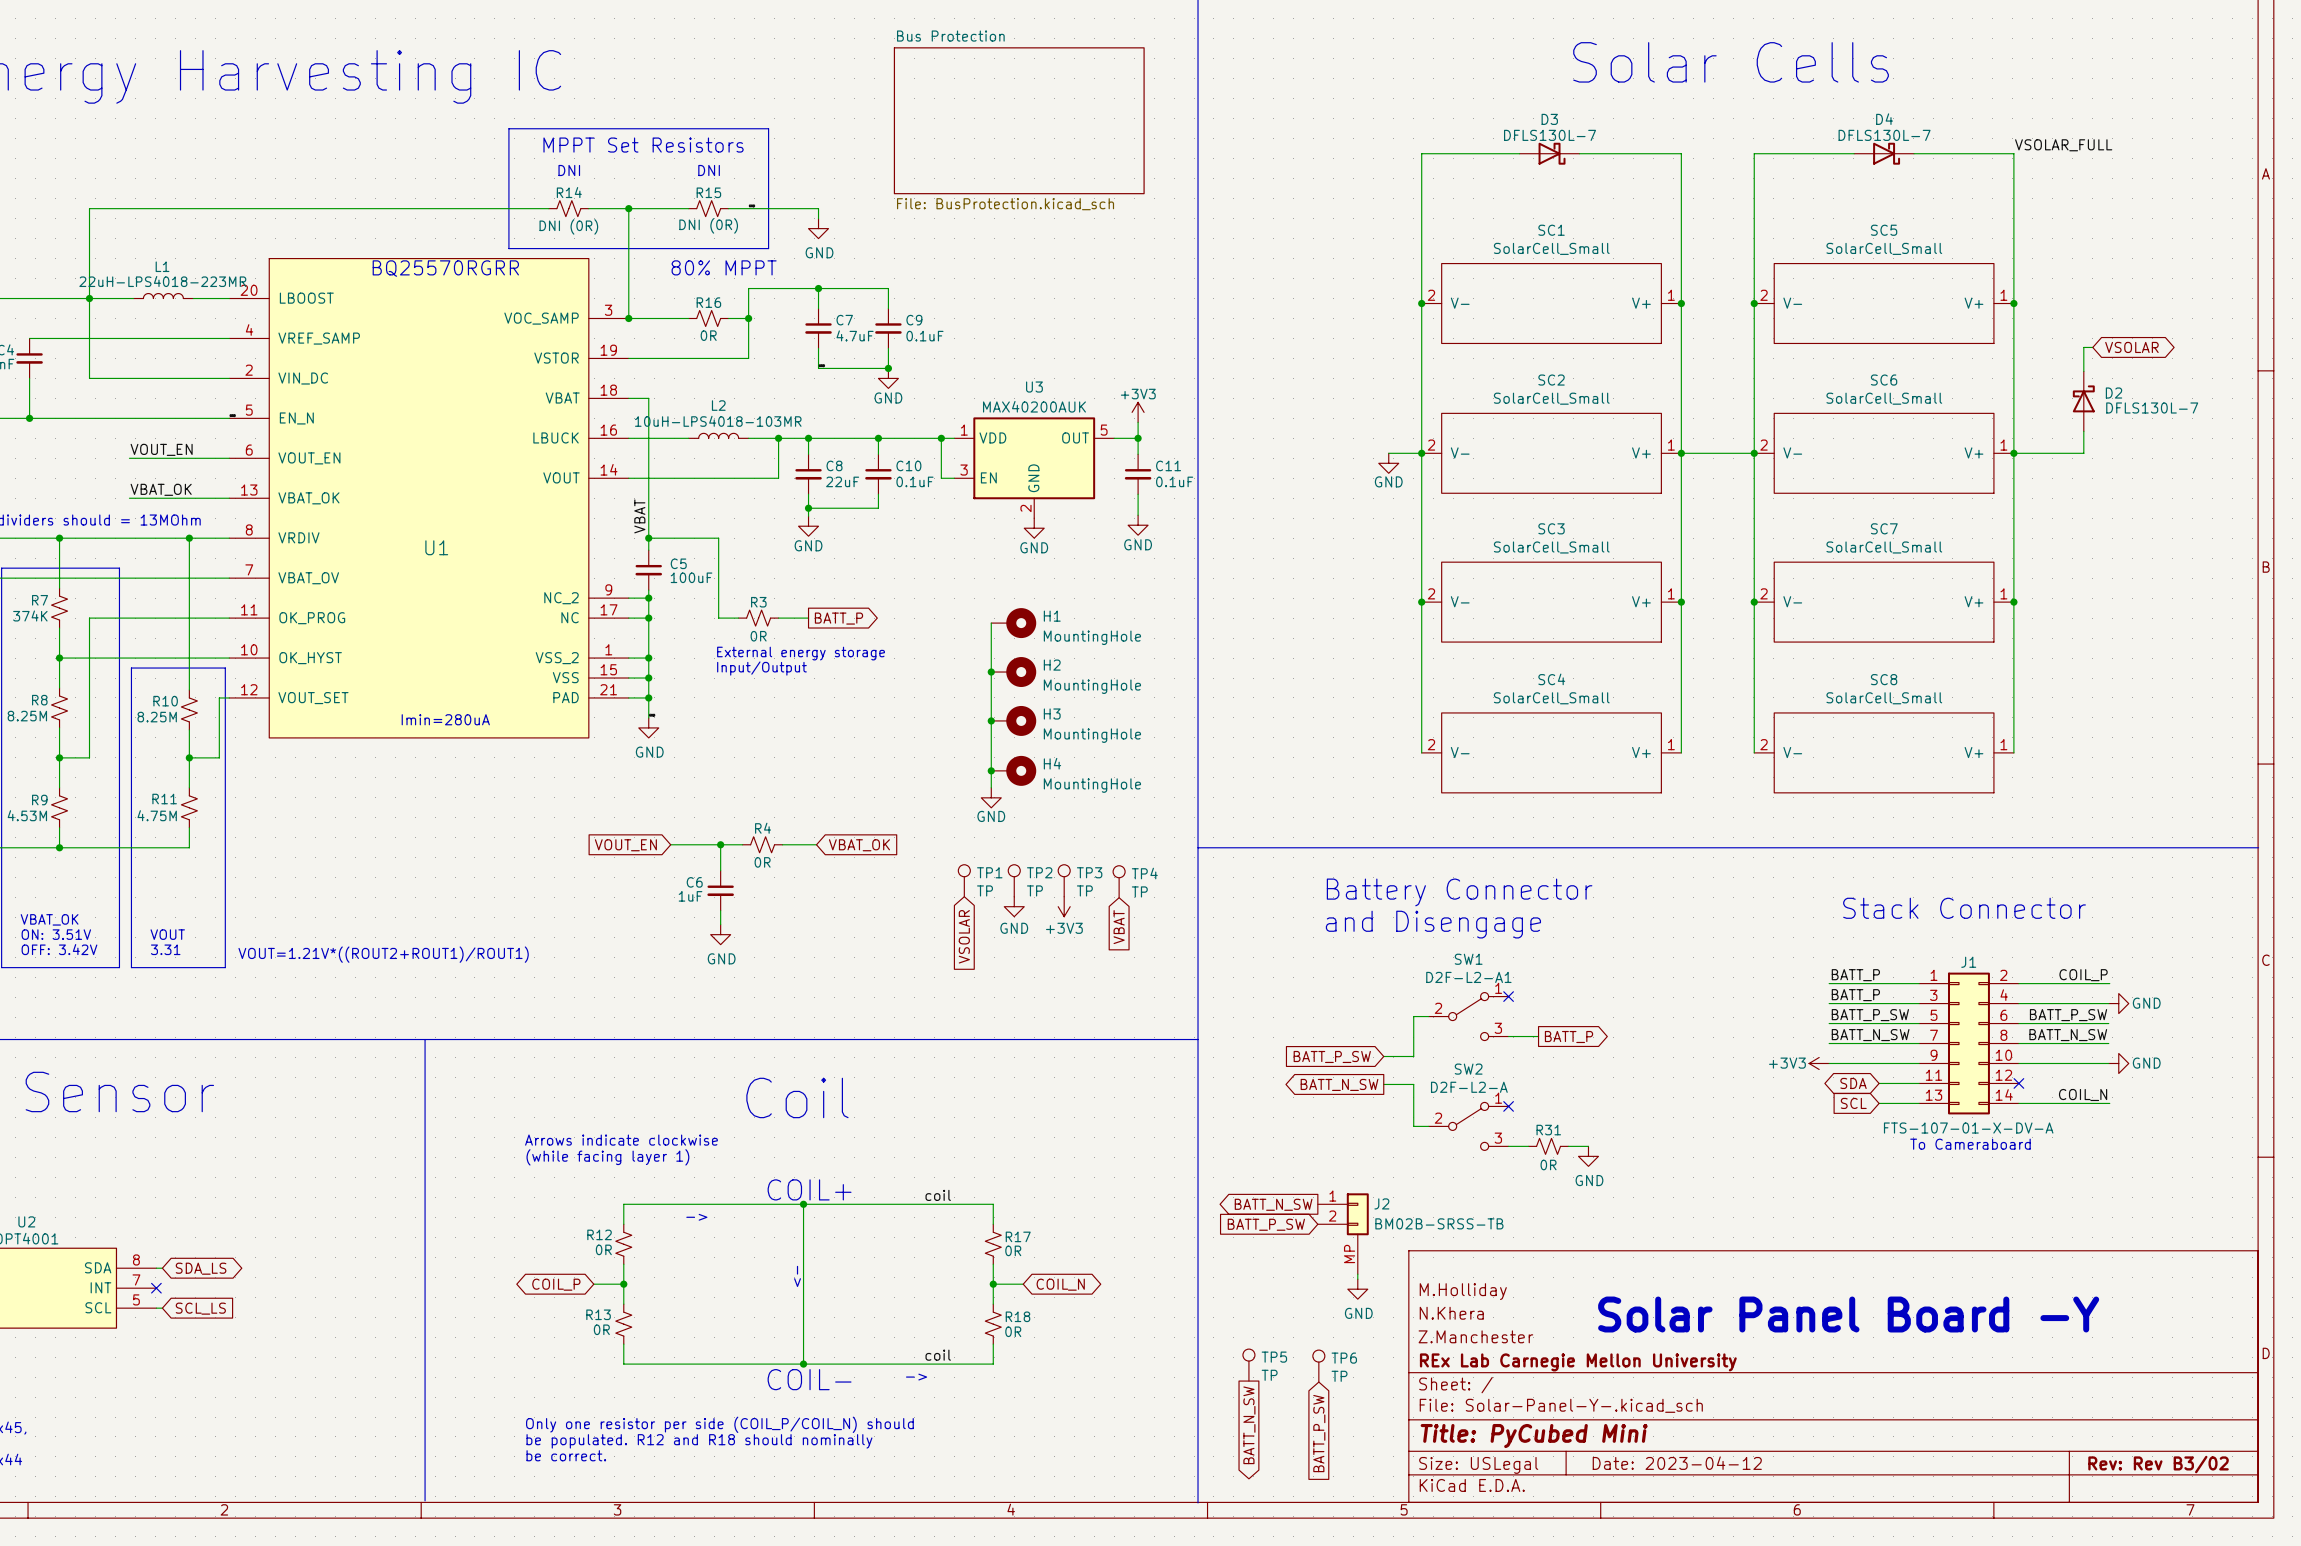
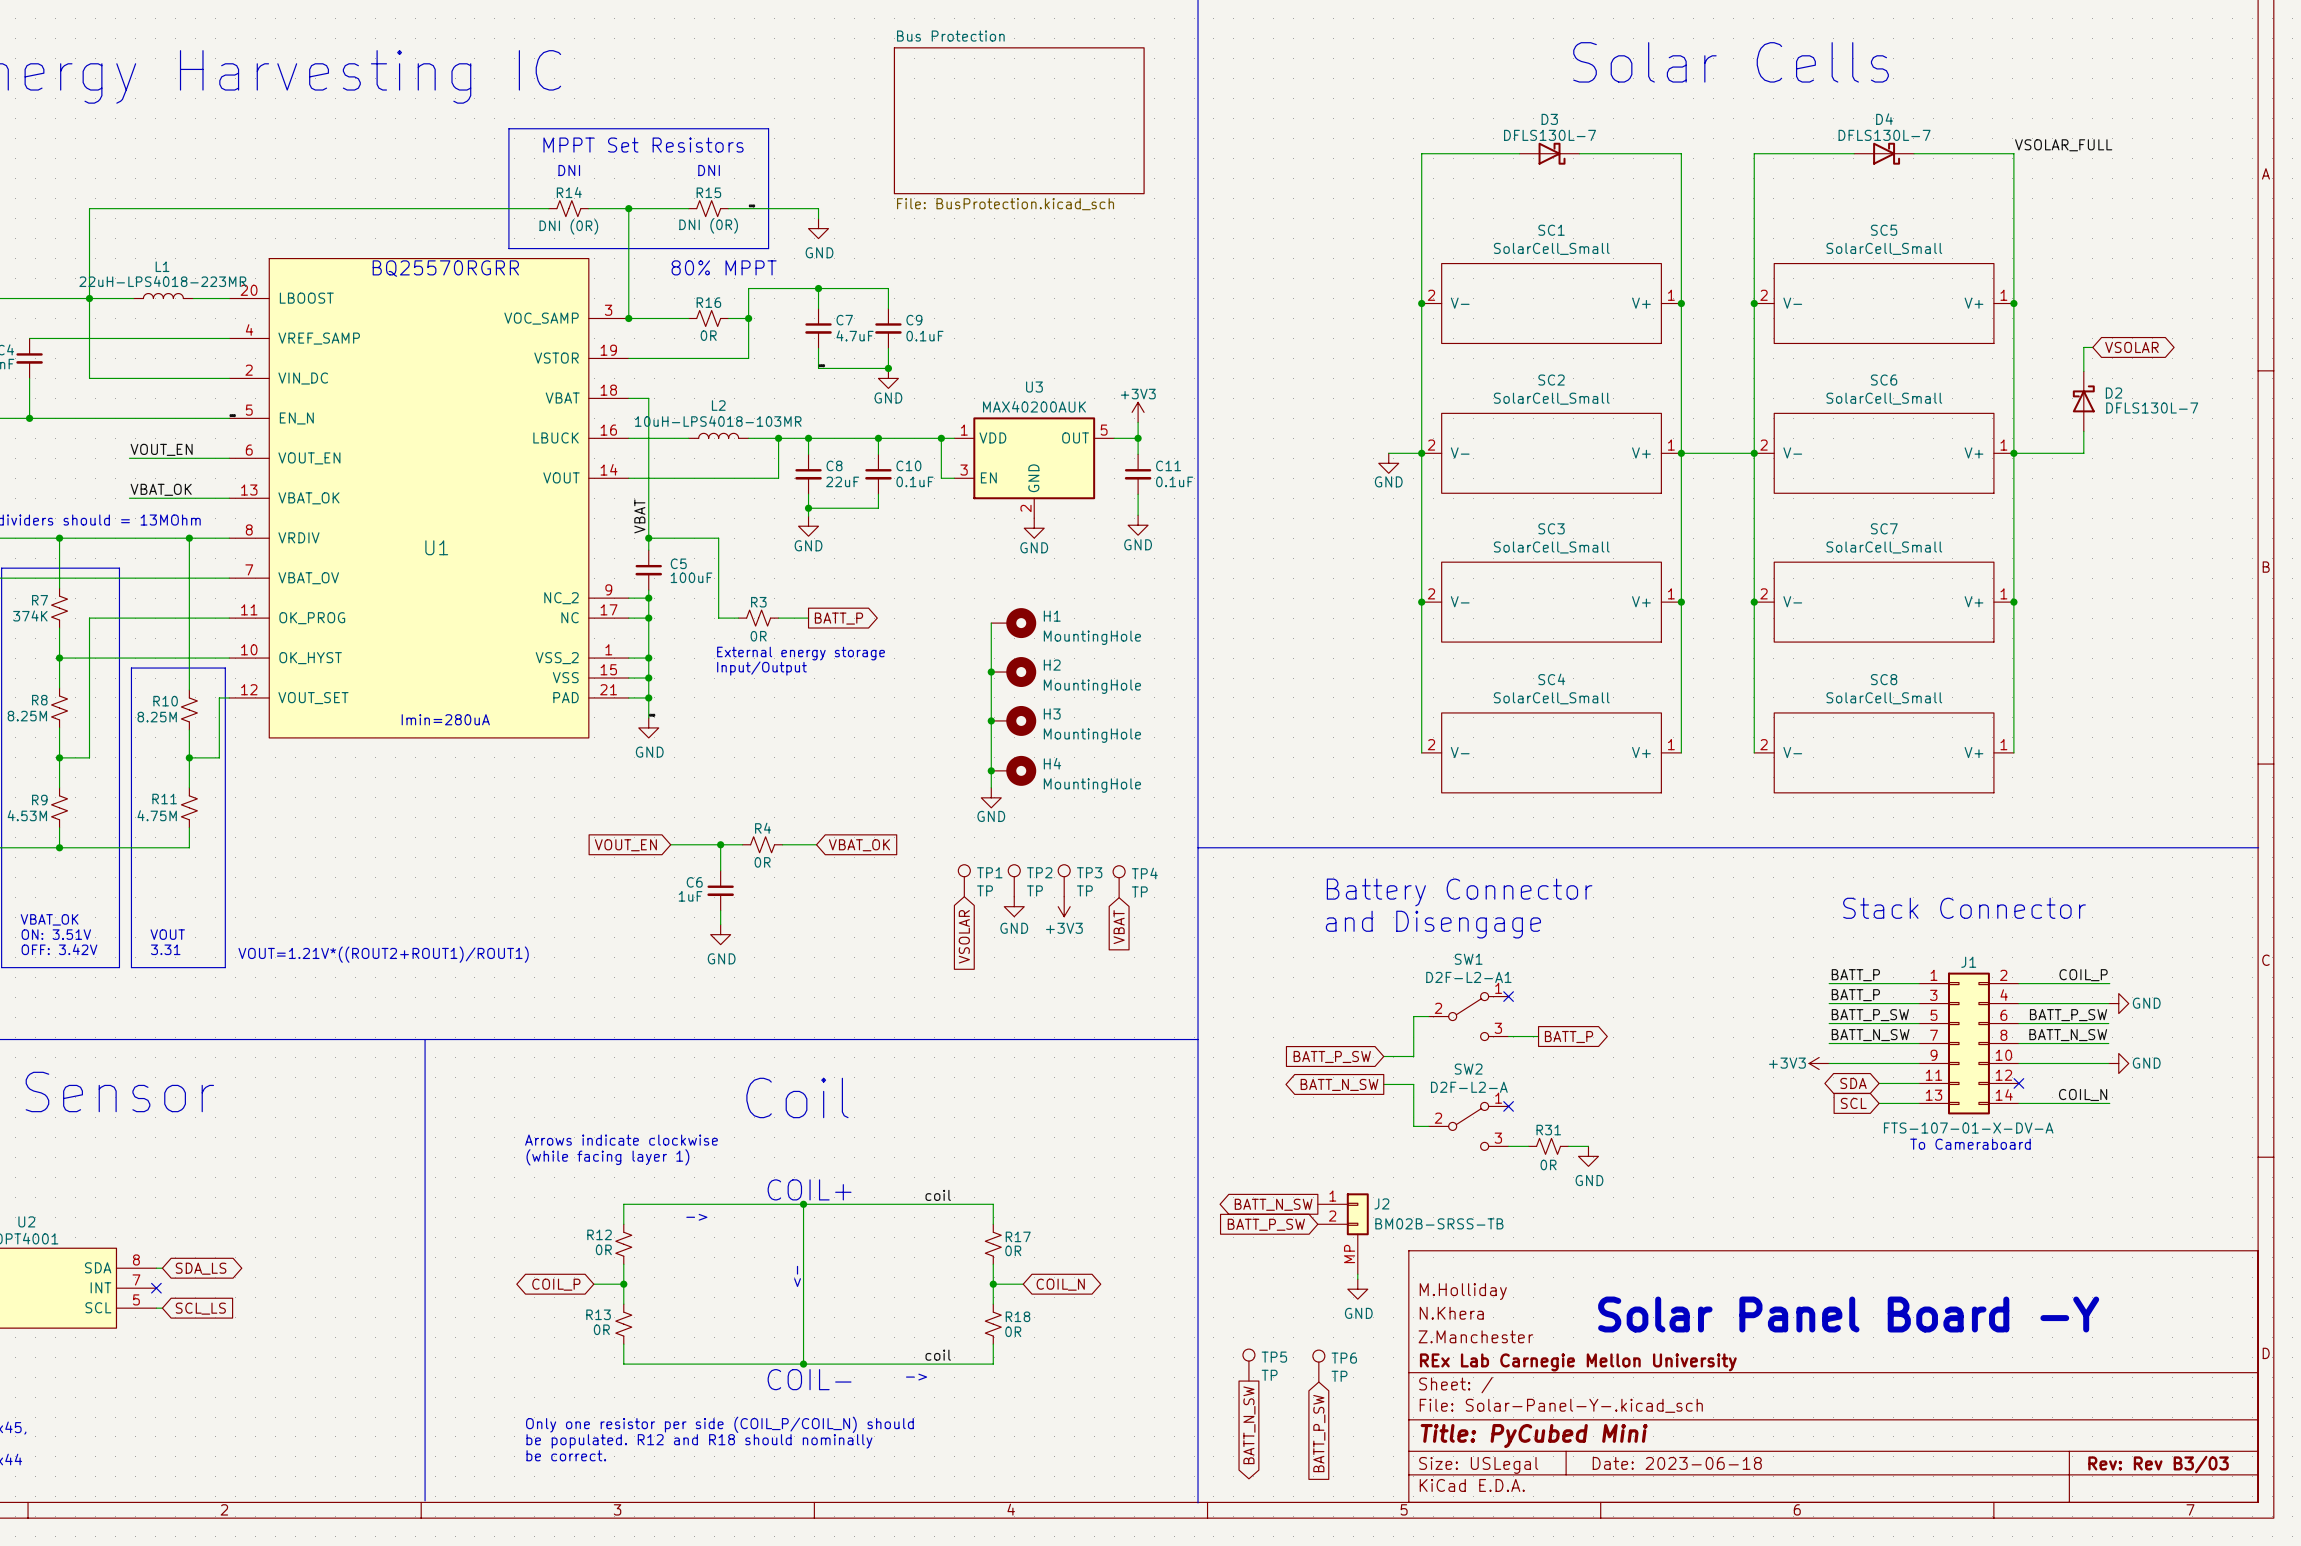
title block: Date: 2023-04-12 (1677, 1463) -> Date: 2023-06-18 (1677, 1463)
title block: Rev: Rev B3/02 (2158, 1464) -> Rev: Rev B3/03 (2158, 1464)

